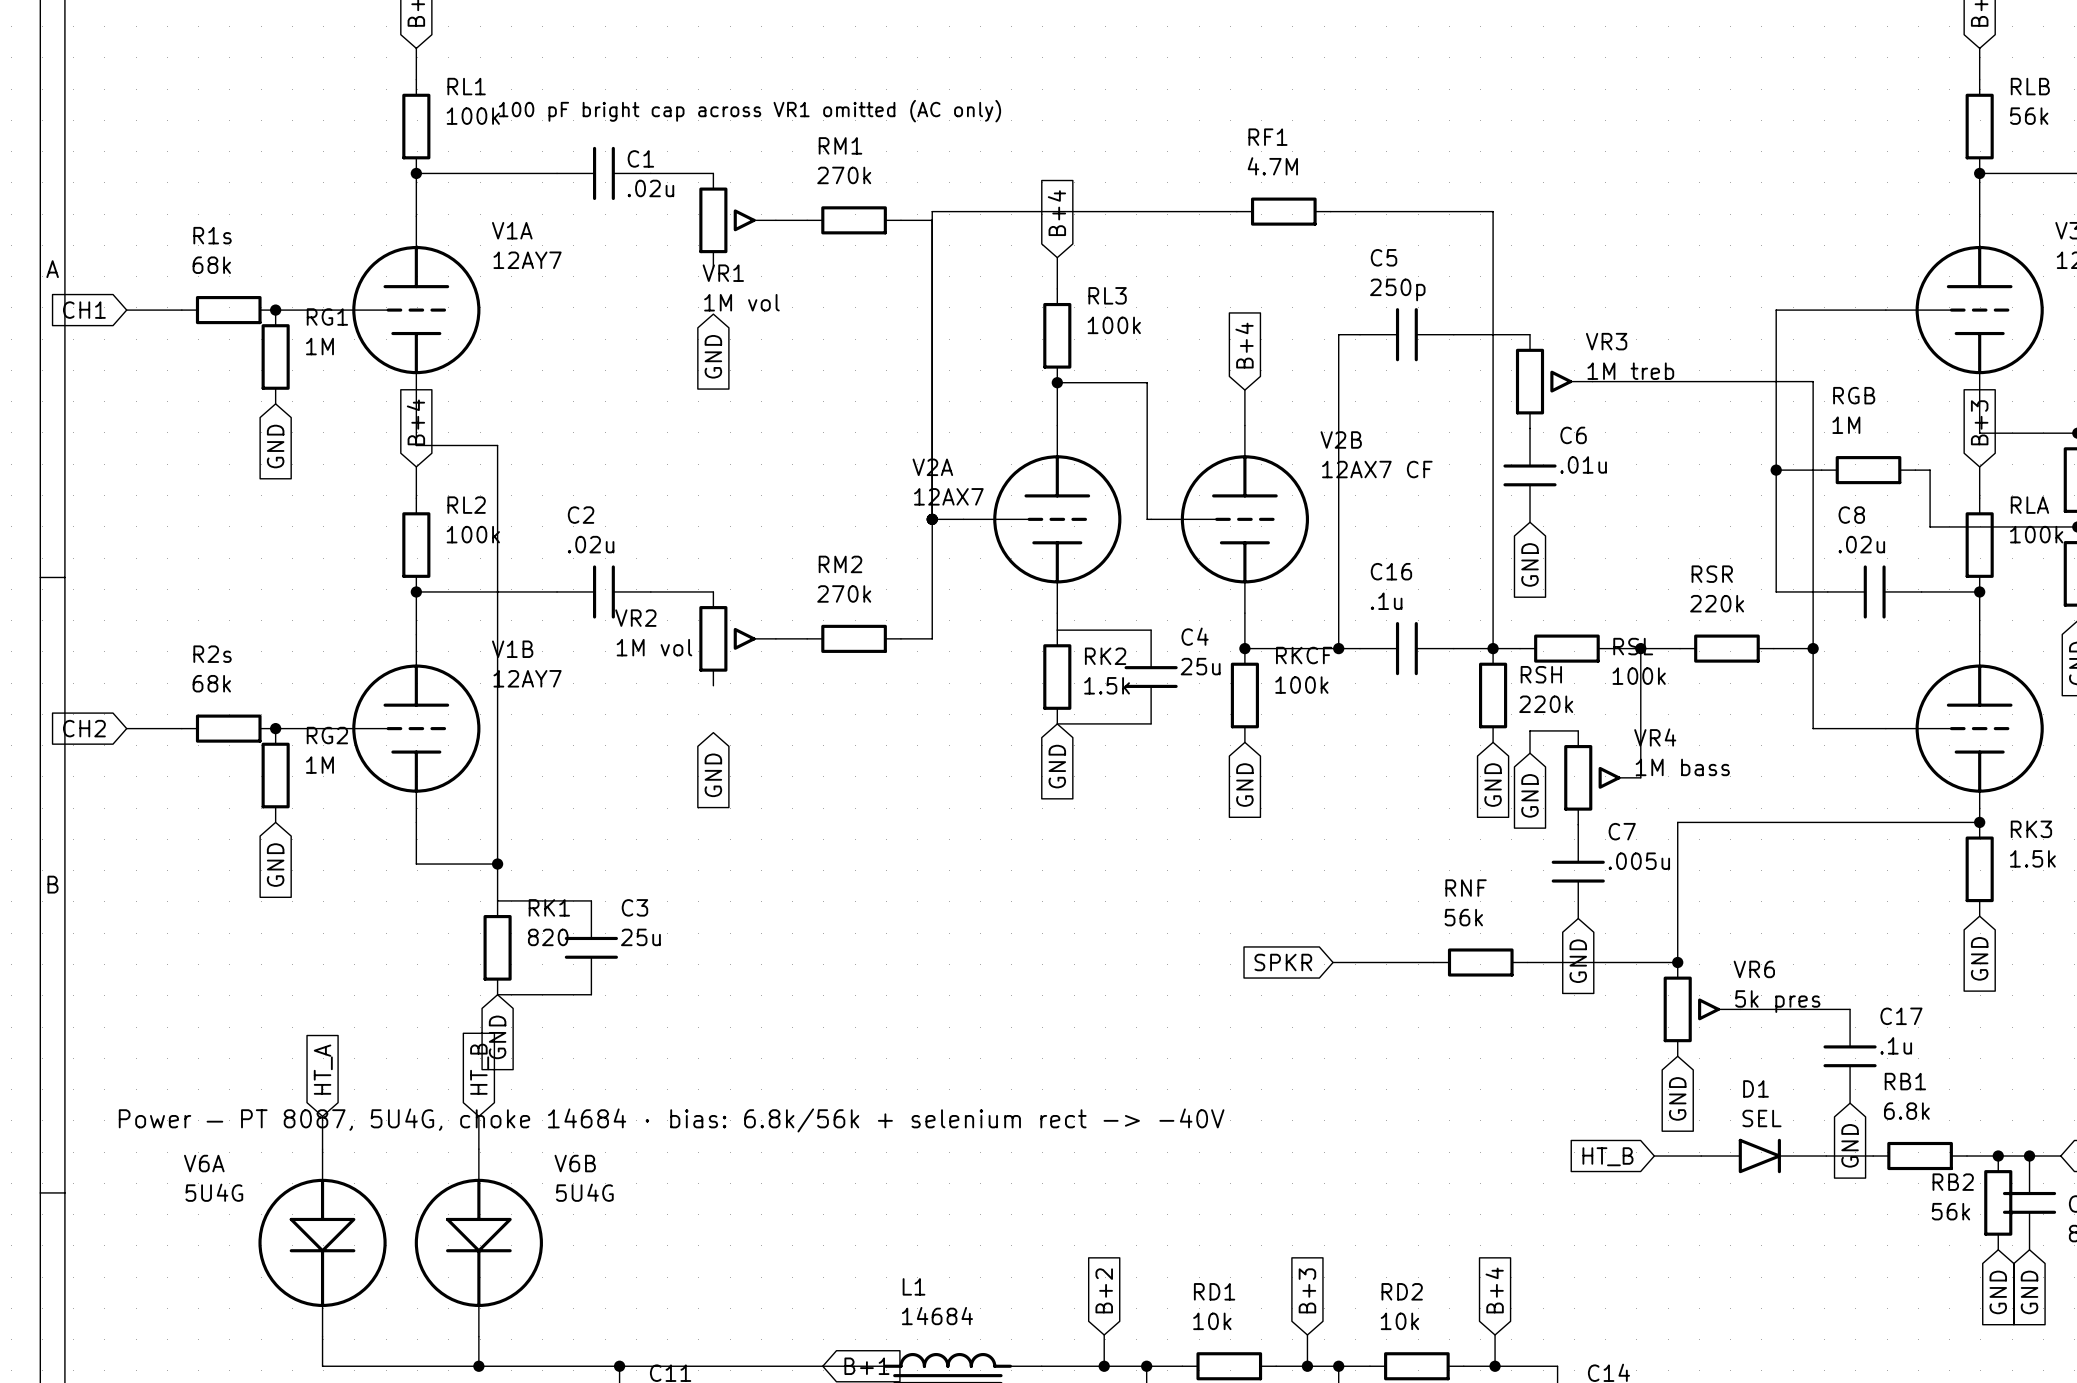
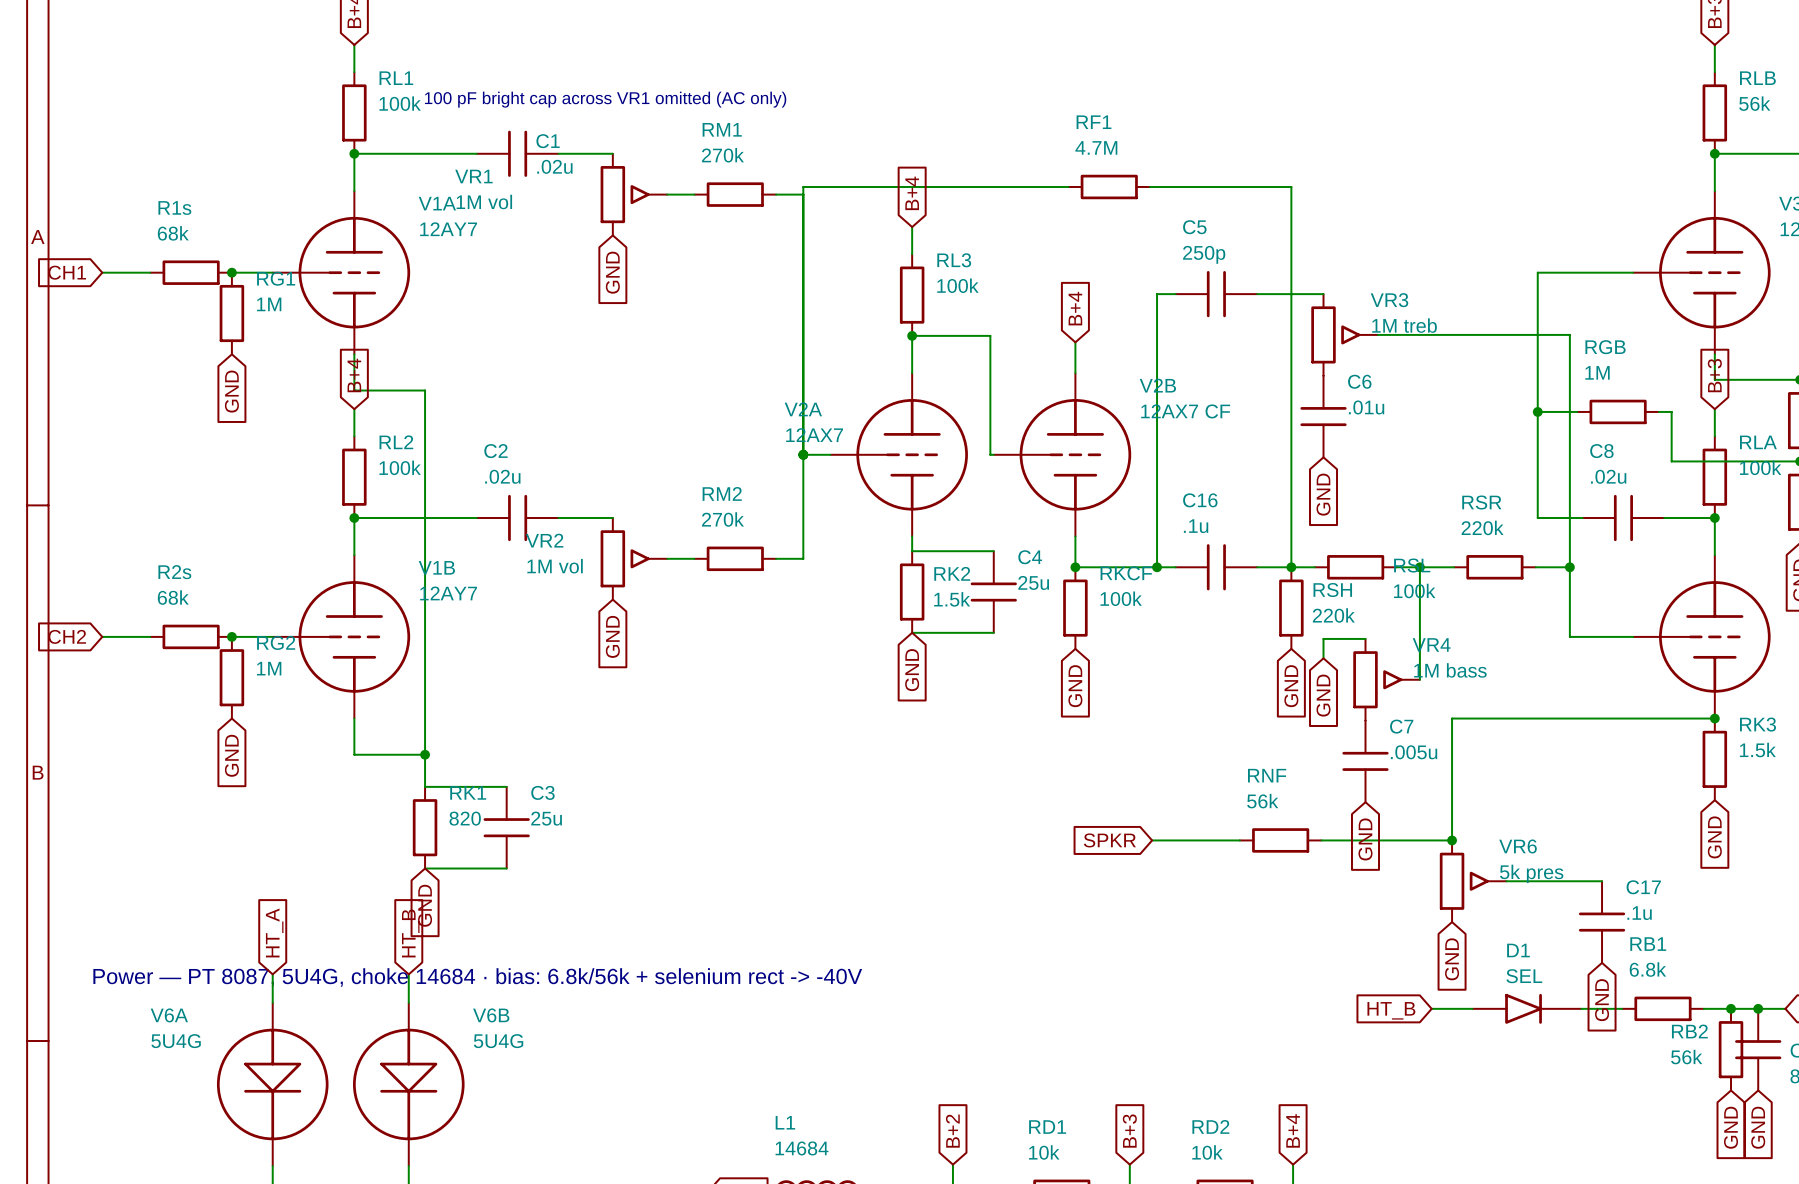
VR1 name position: VR1 (723, 273) -> VR1 (473, 176)
VR1 value position: 1M vol (741, 302) -> 1M vol (484, 201)
global label position: GND (713, 356) -> GND (612, 272)
global label position: GND (713, 775) -> GND (612, 636)

